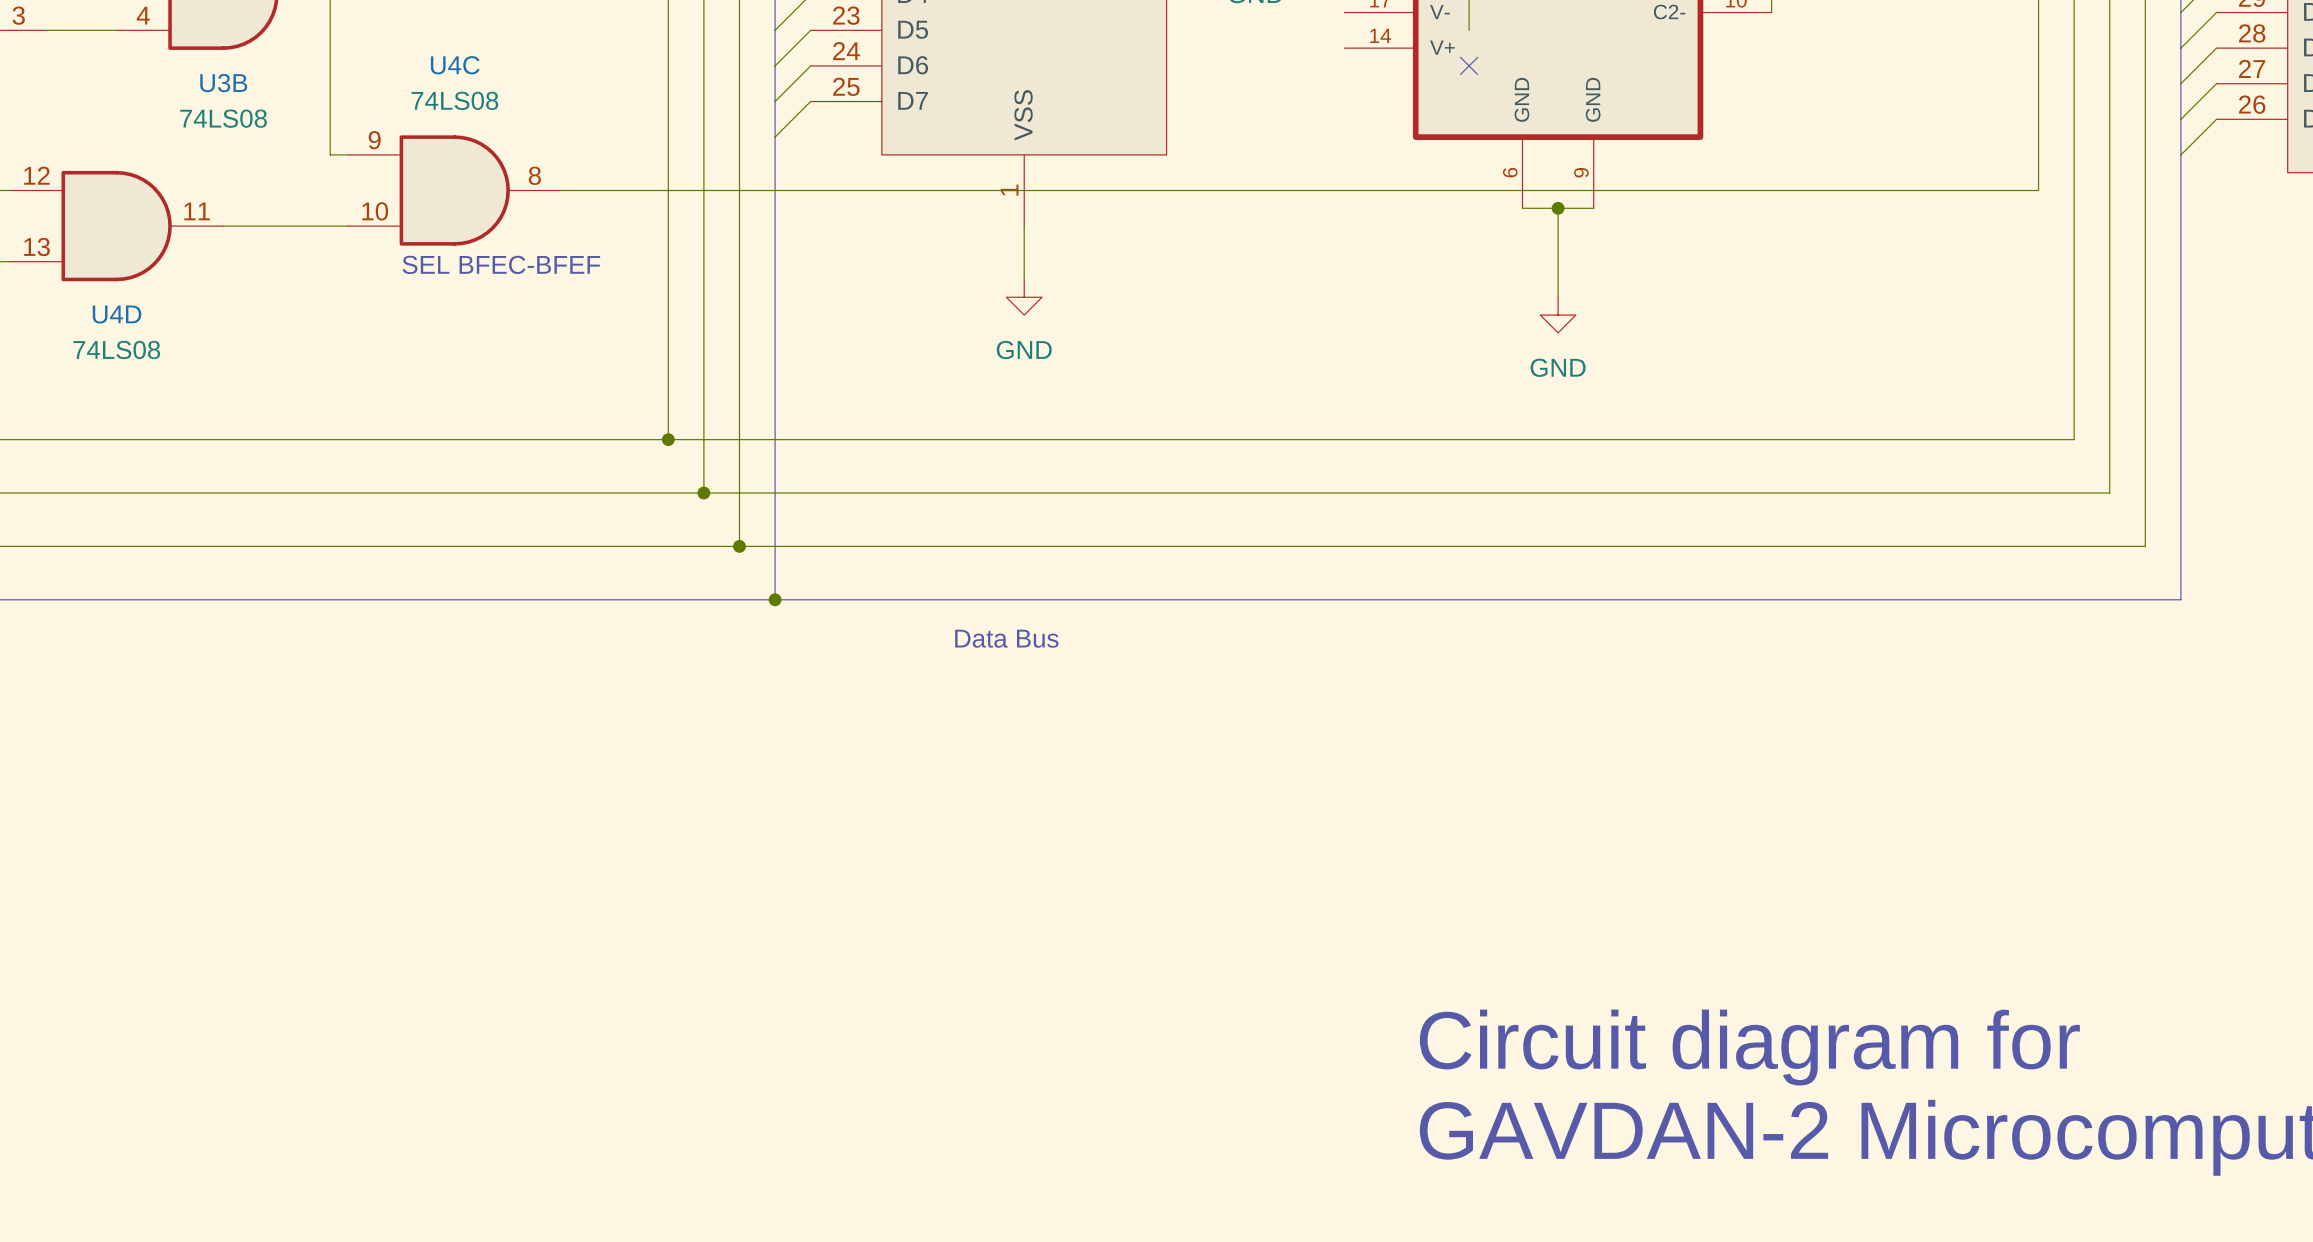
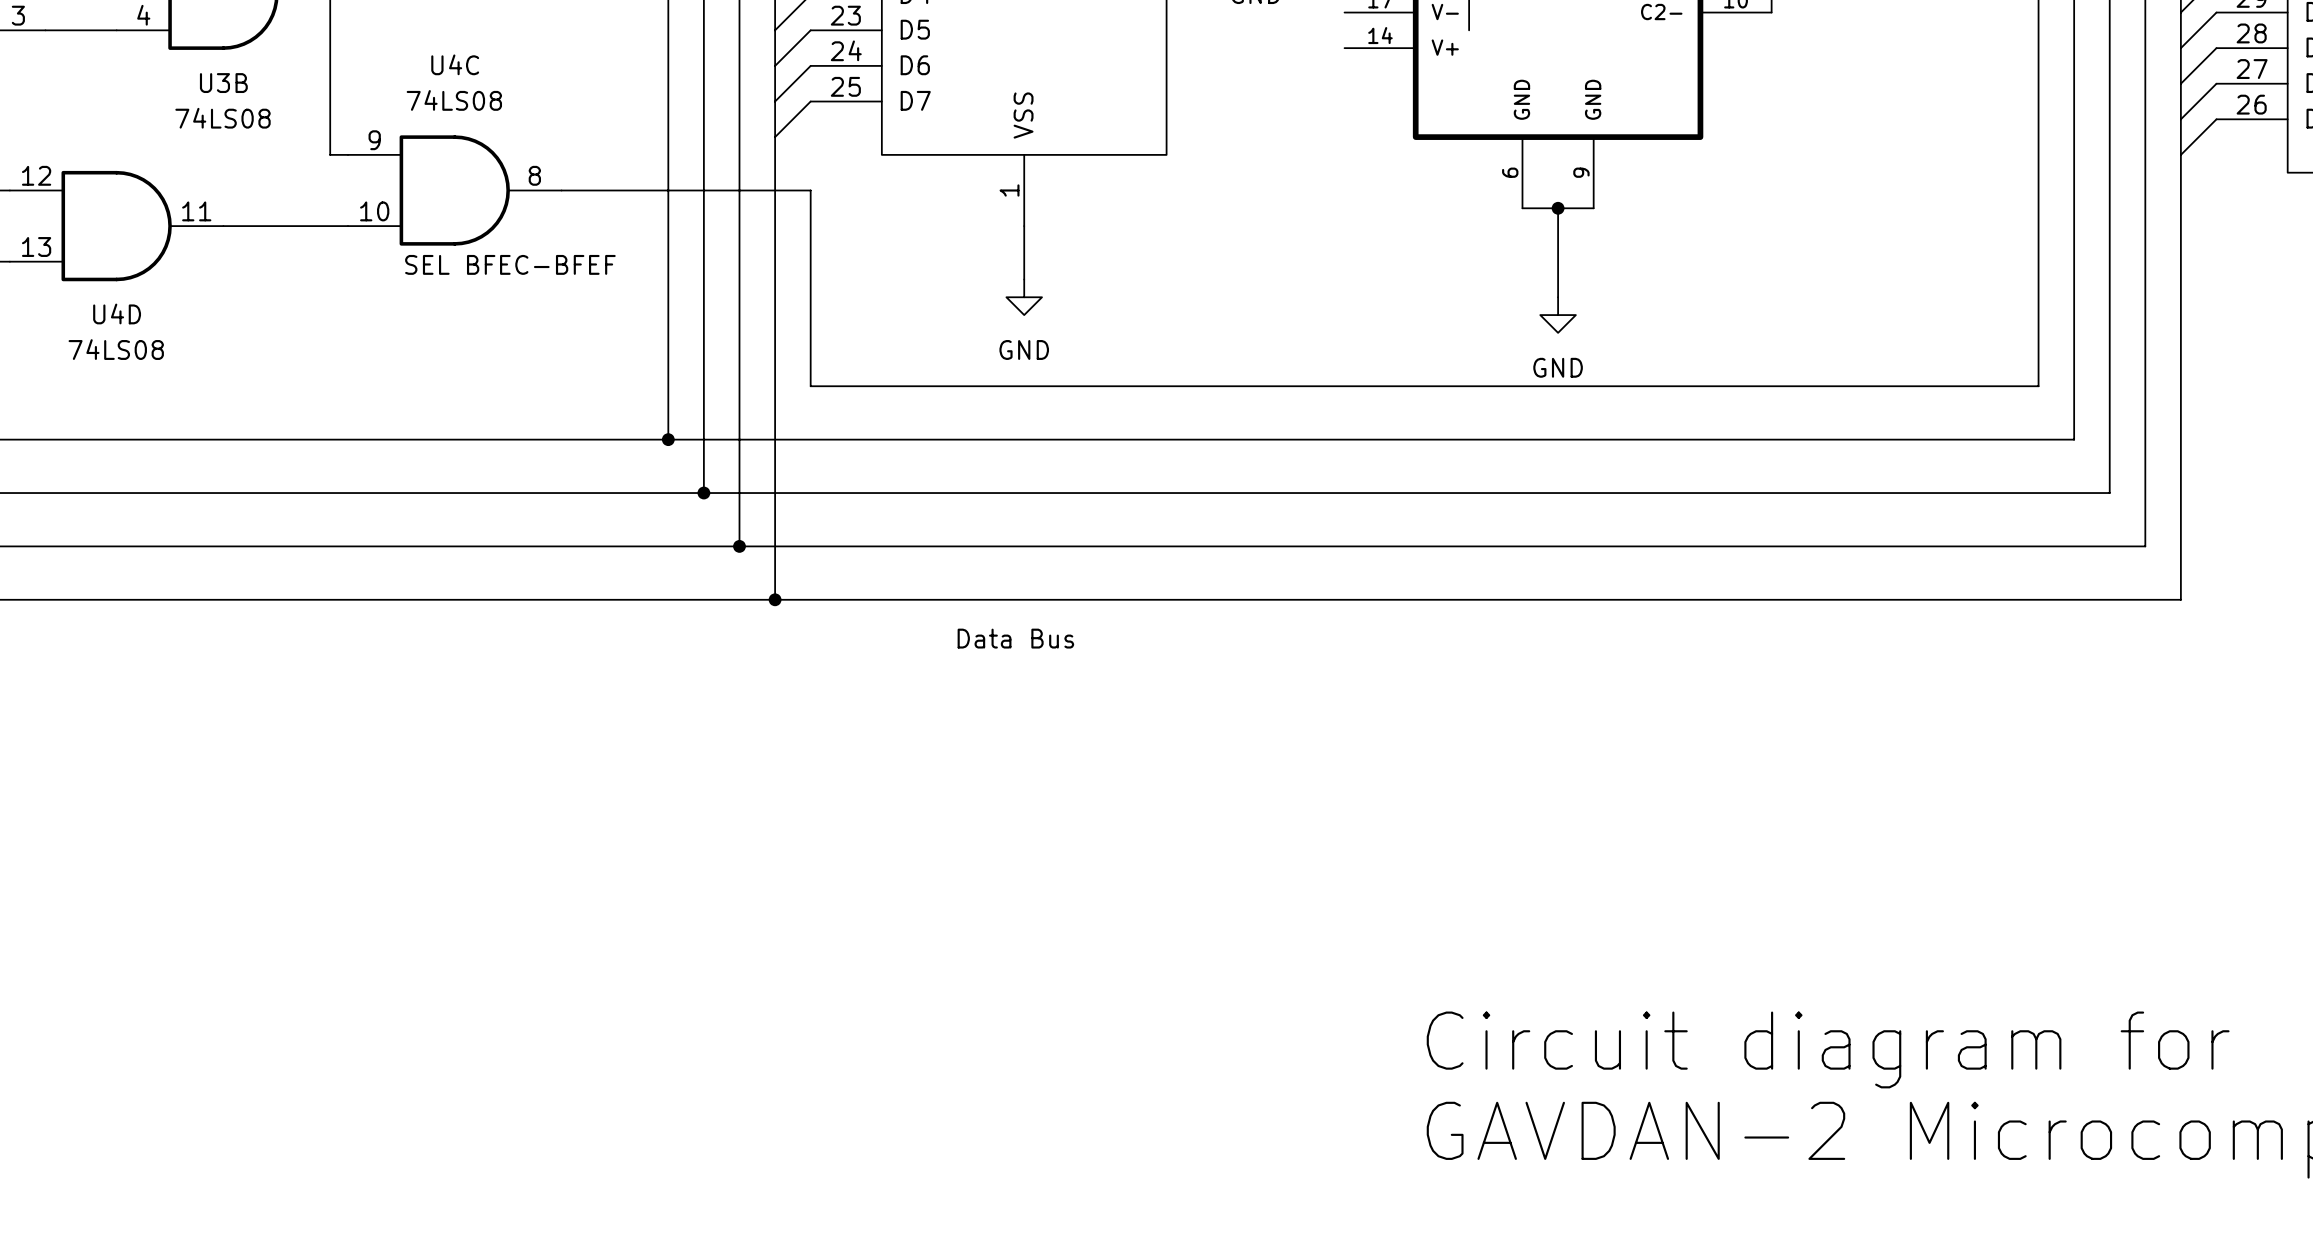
no-connect mark: (1469, 65) -> none
wire: (810, 190) (2038, 190) -> (810, 190) (810, 386) (2038, 386) (2038, 190)

